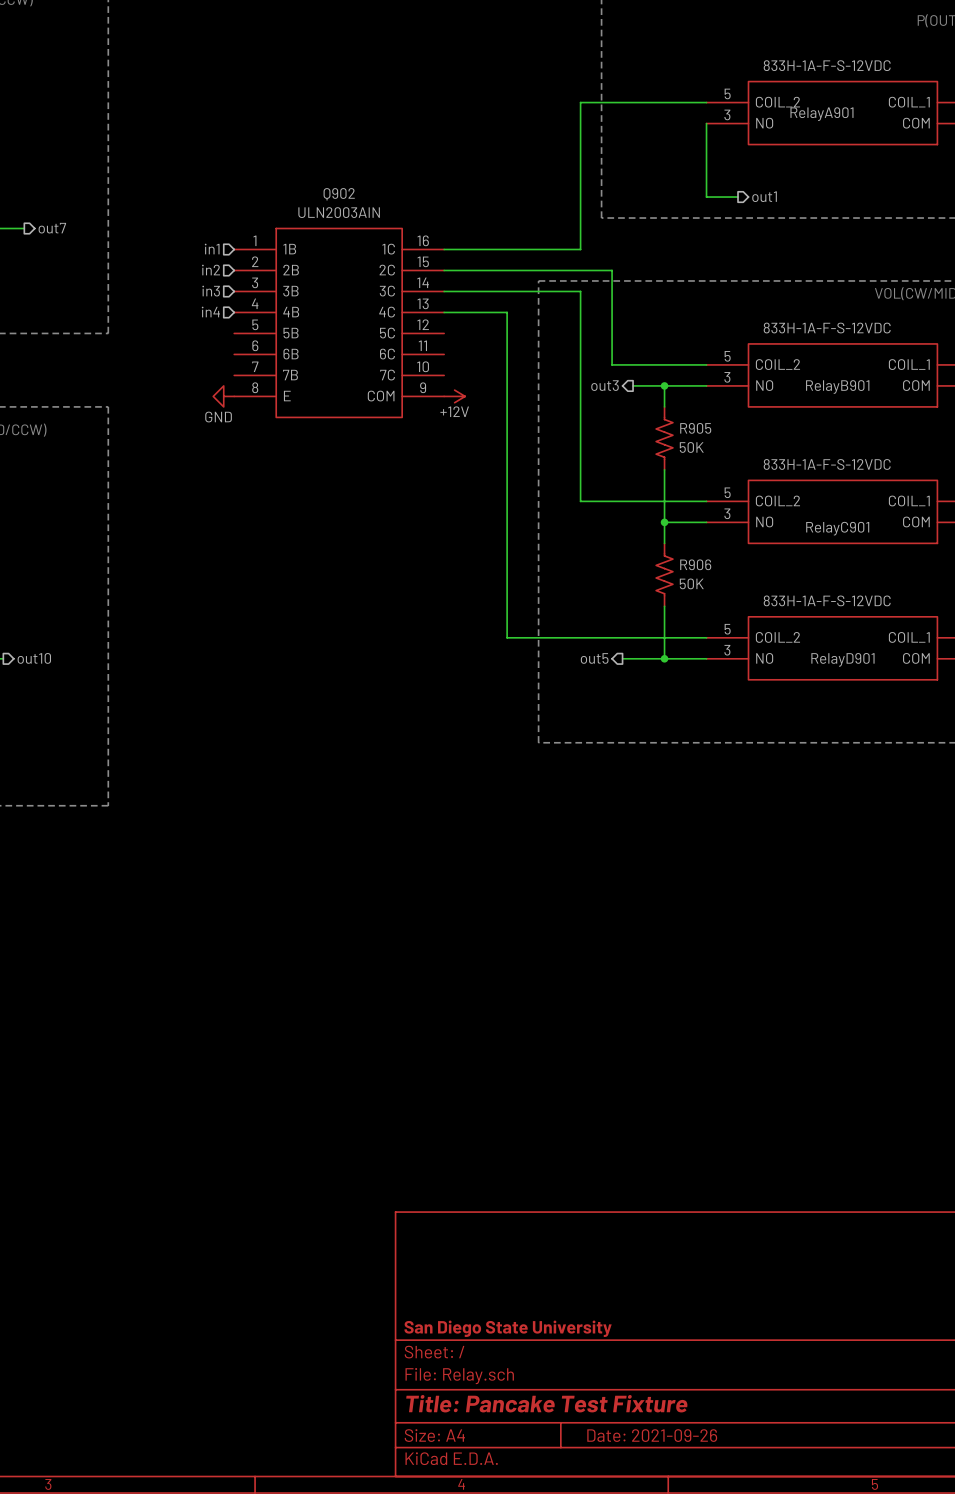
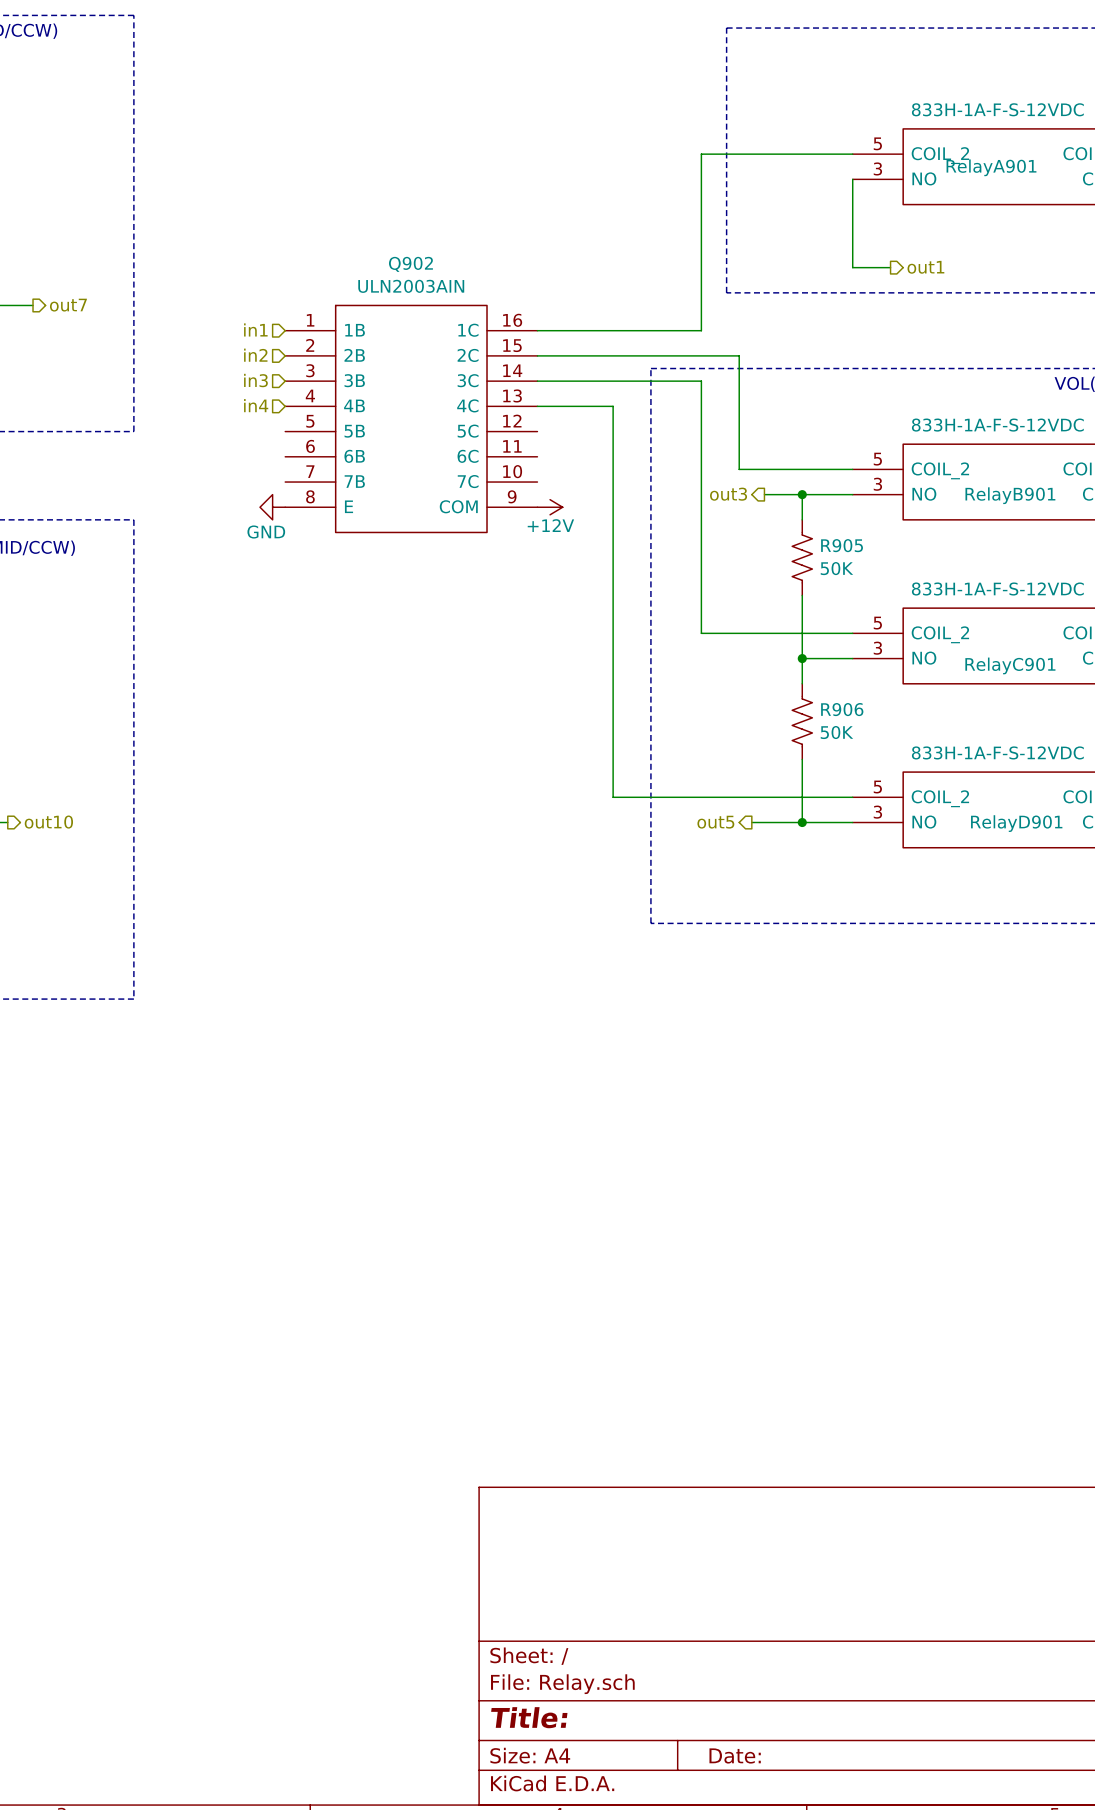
title block: San Diego State University (508, 1328) -> none
title block: Title: Pancake Test Fixture (546, 1403) -> Title: (529, 1717)
title block: Date: 2021-09-26 (652, 1435) -> Date: (735, 1755)

